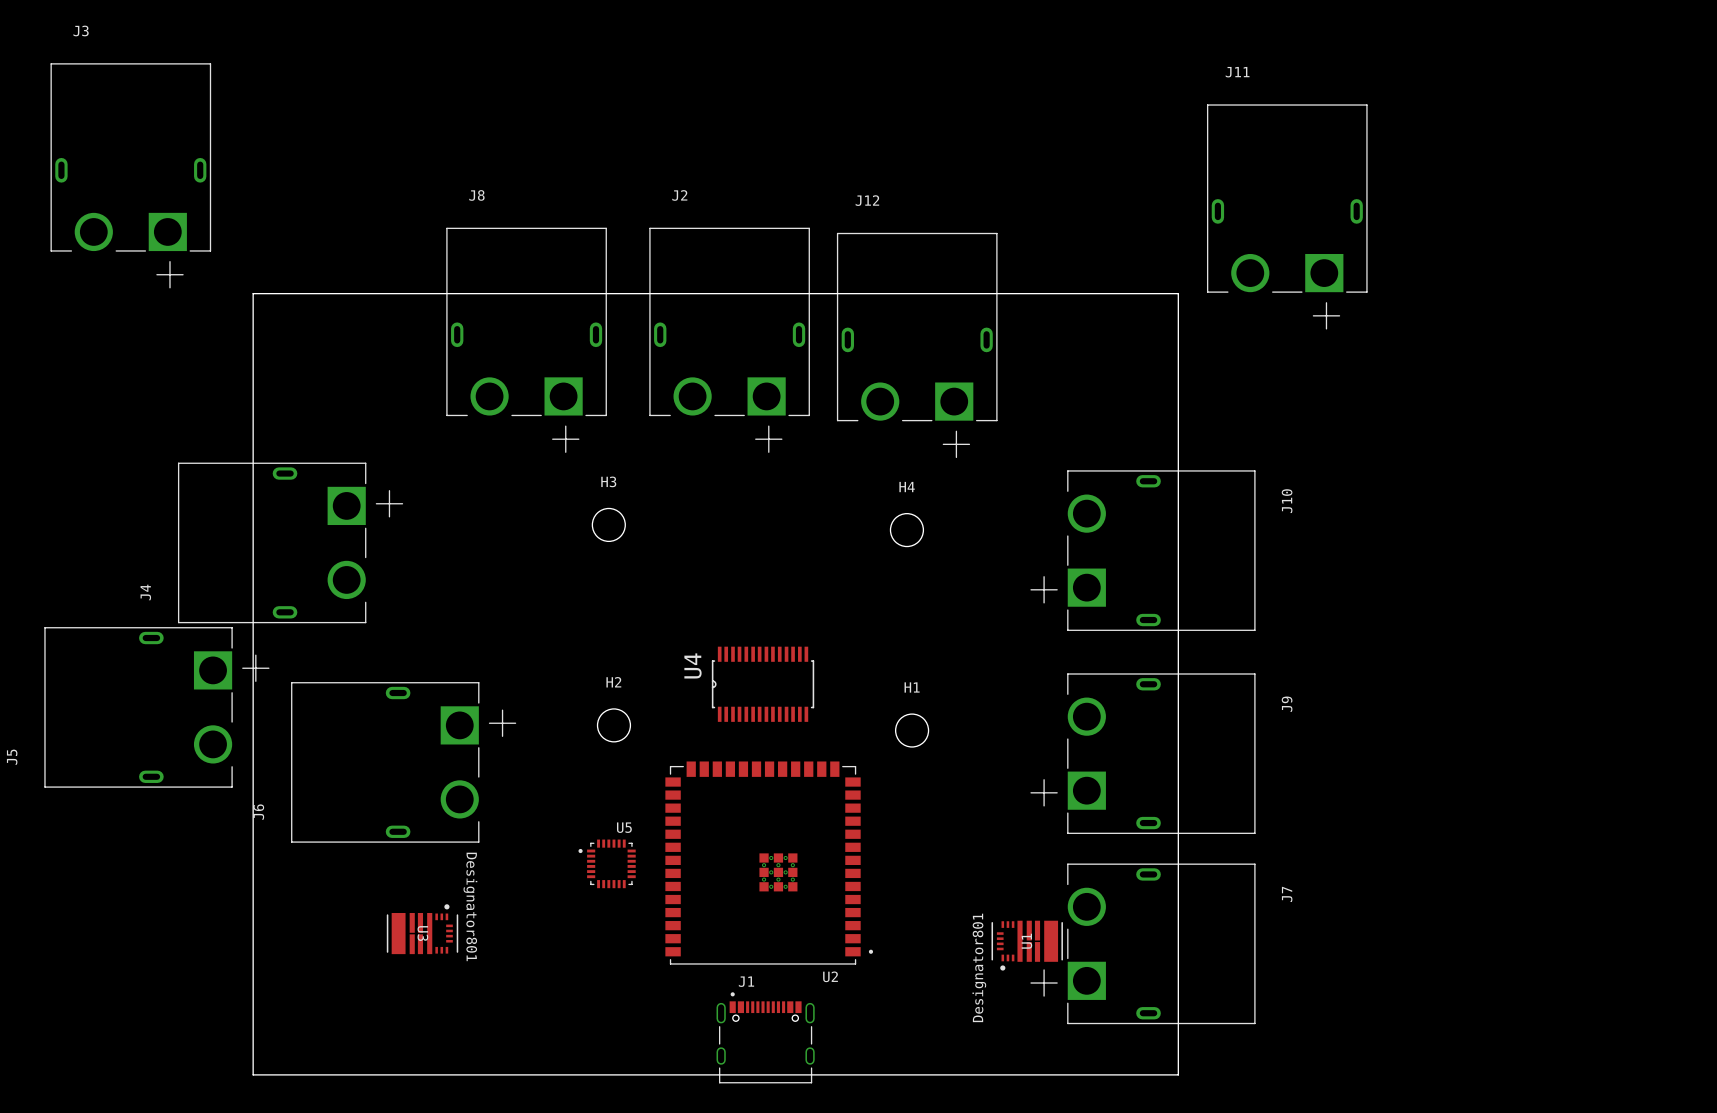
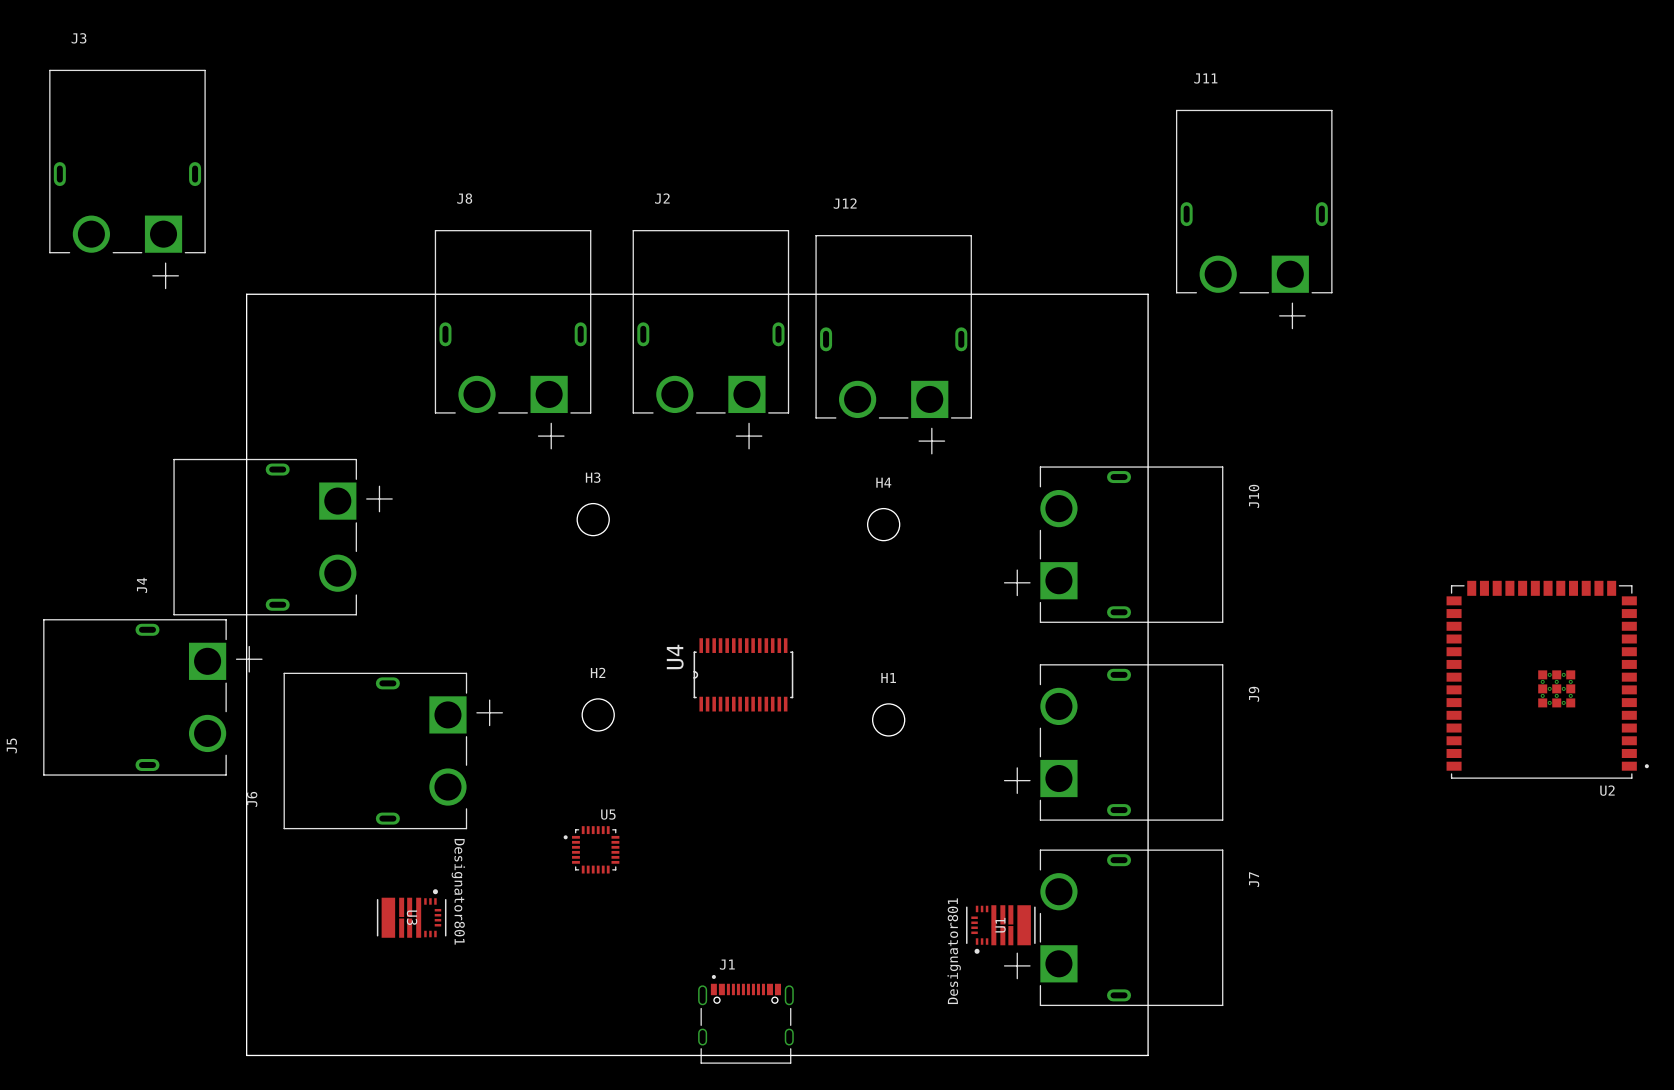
U2 position: (769, 863) -> (1547, 679)

